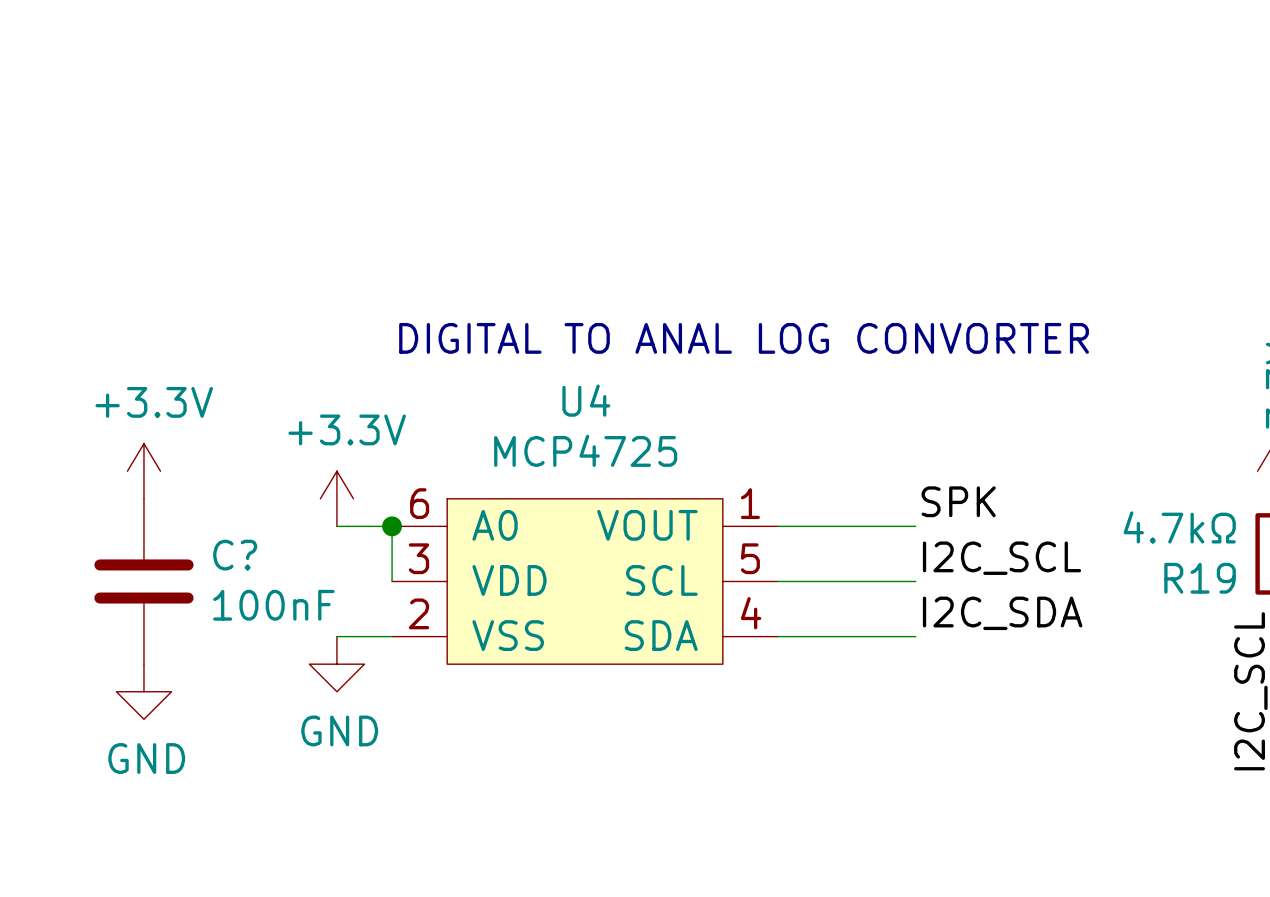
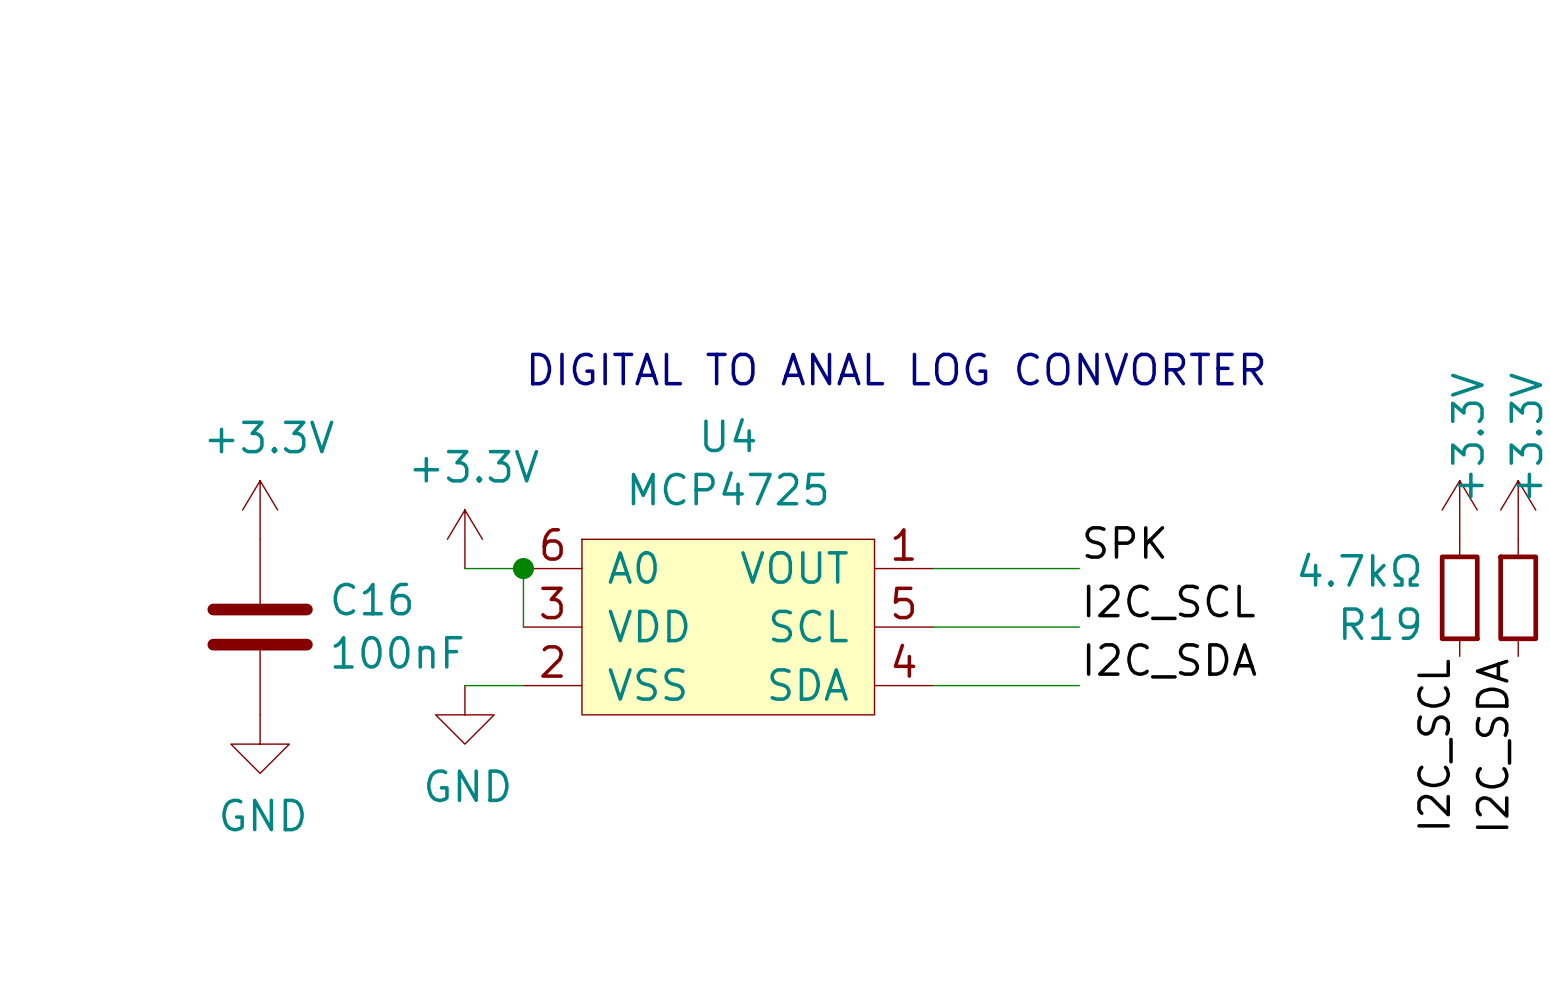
C? name: C? (235, 555) -> C16 (372, 599)

